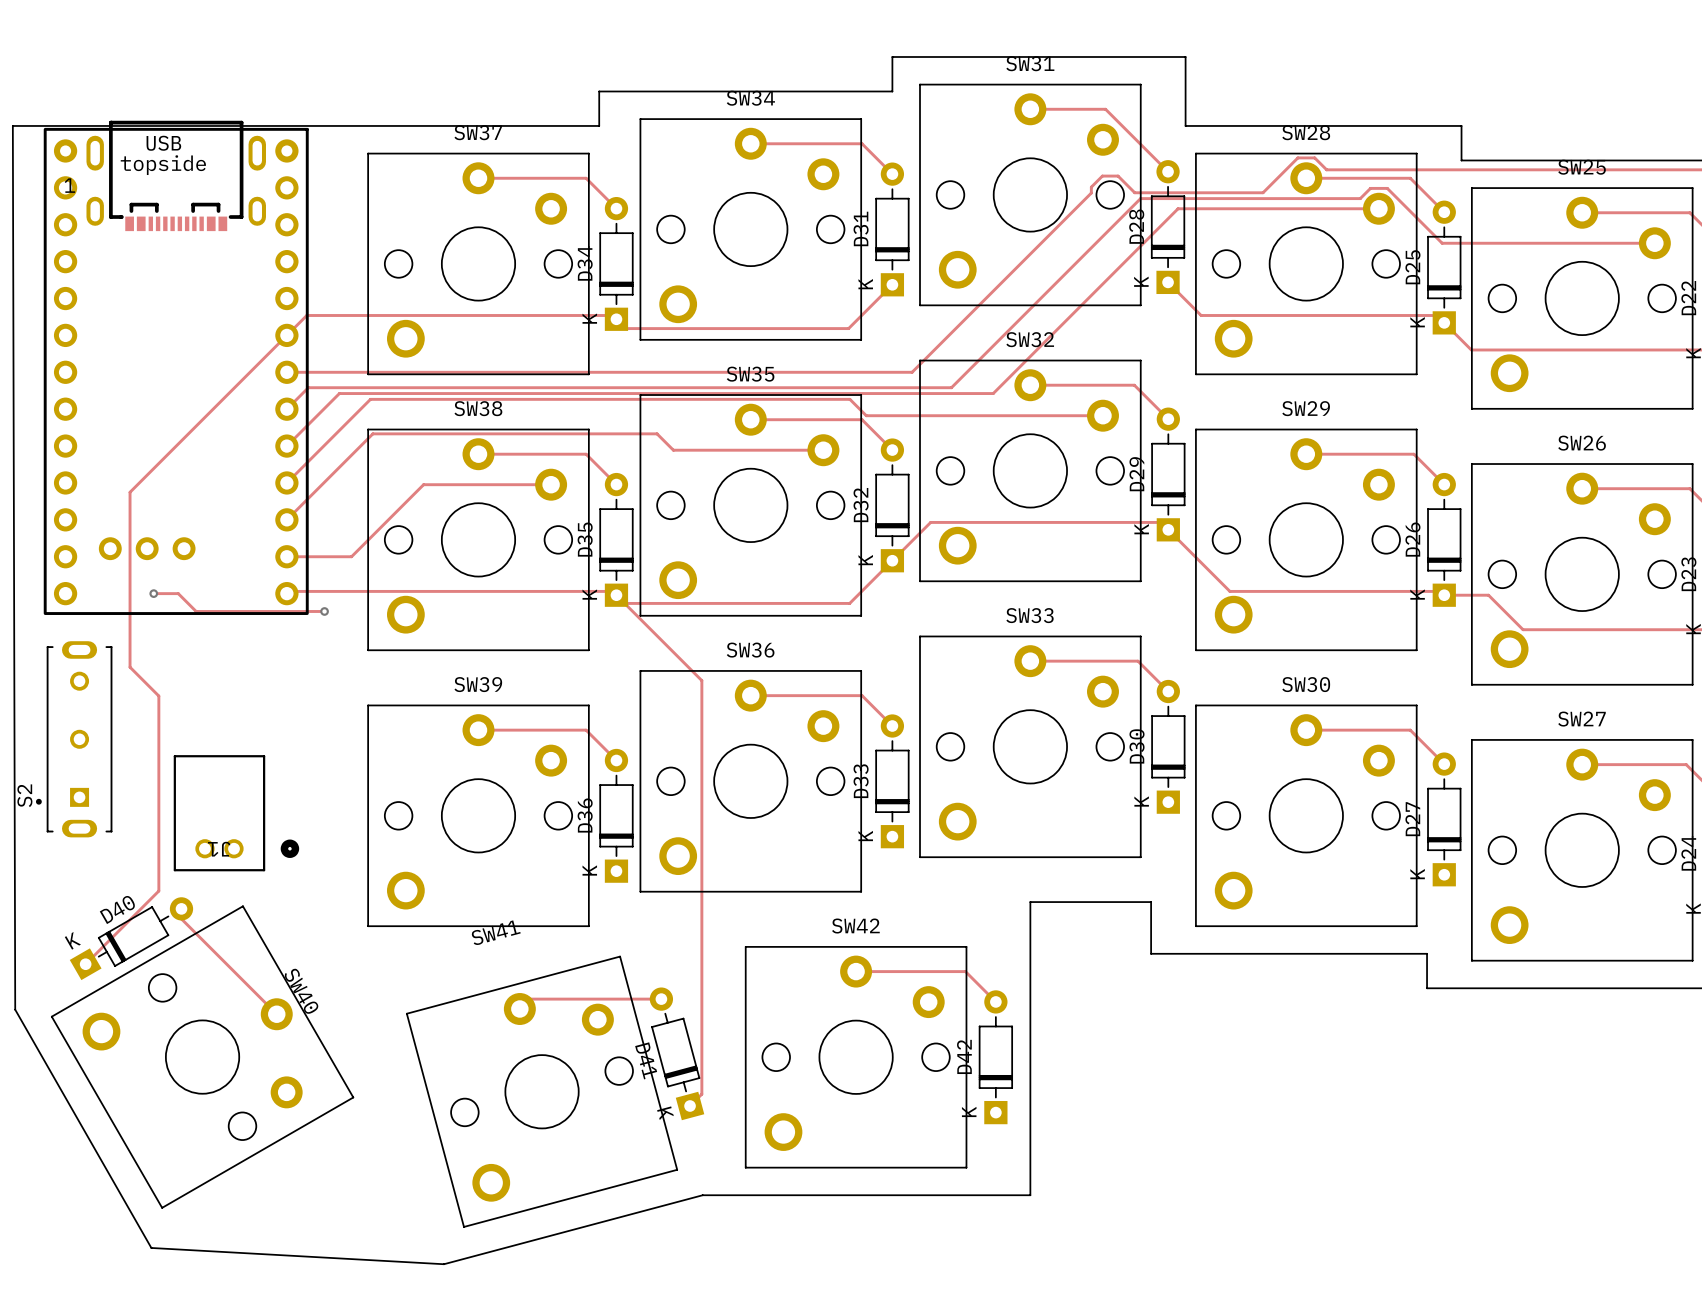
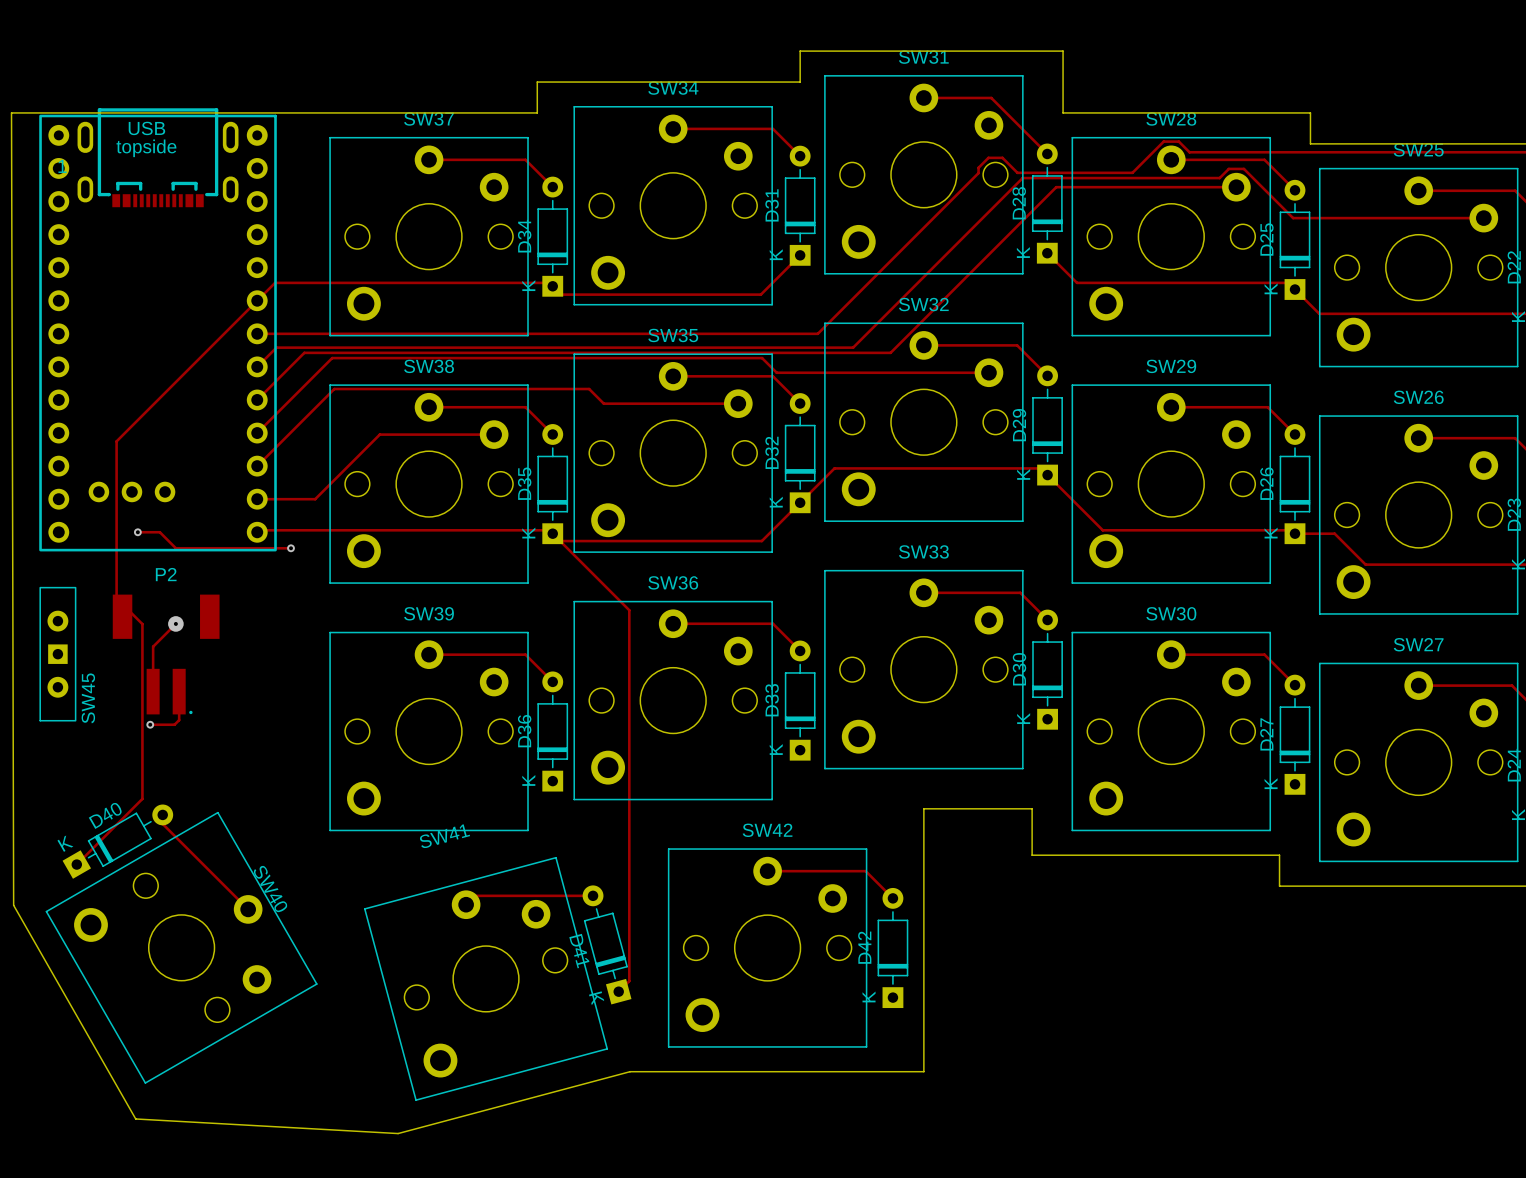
track: none -> (175, 623) (153, 646) (153, 691)
via: none -> (175, 623)
SW45: none -> (57, 654)
P2: none -> (166, 654)
S2: (74, 739) -> none
track: none -> (179, 691) (179, 720) (174, 724) (150, 724)
via: none -> (150, 724)
J1: (236, 813) -> none

